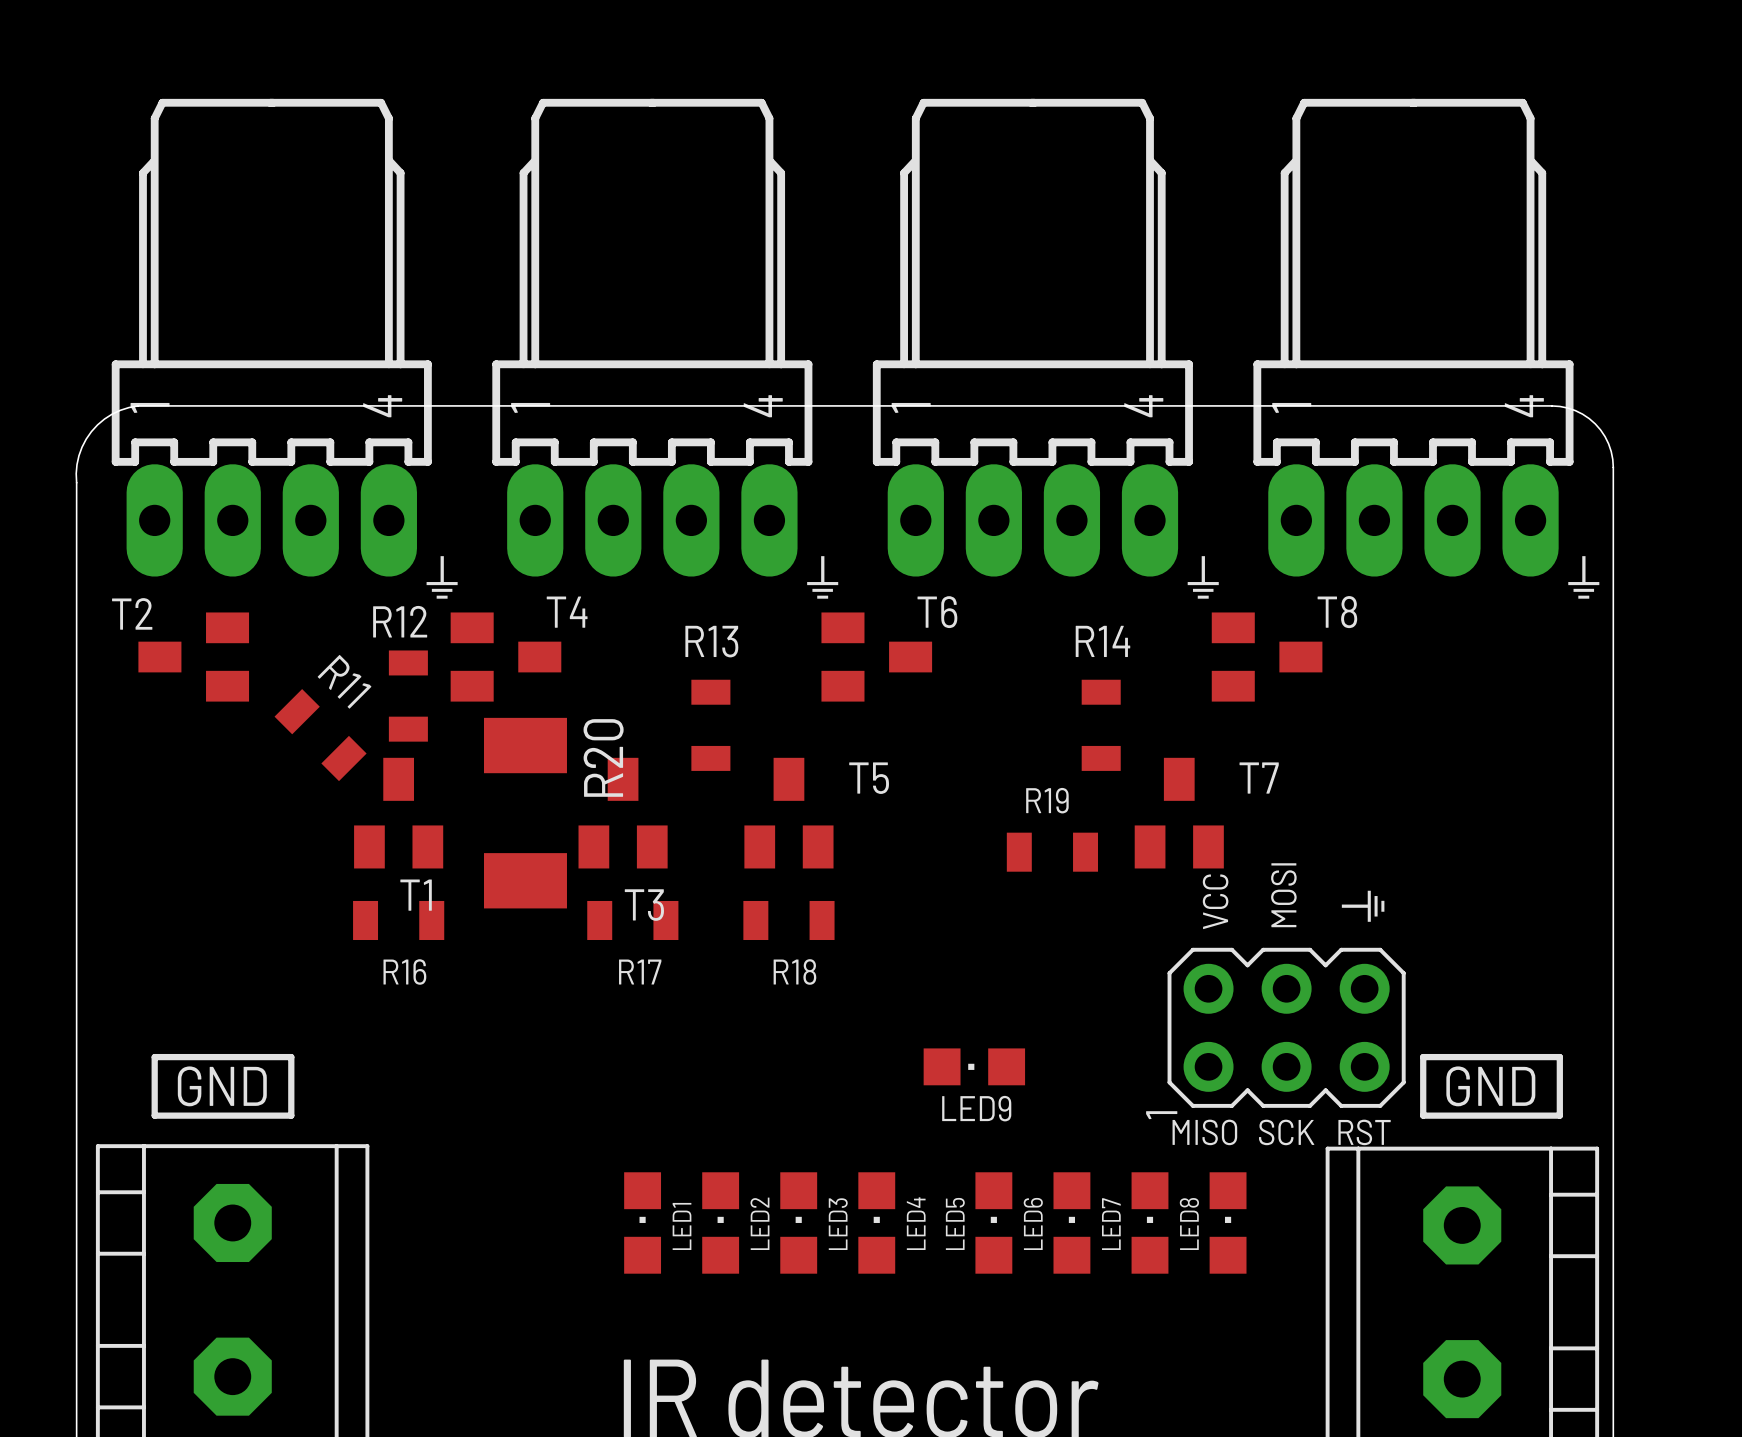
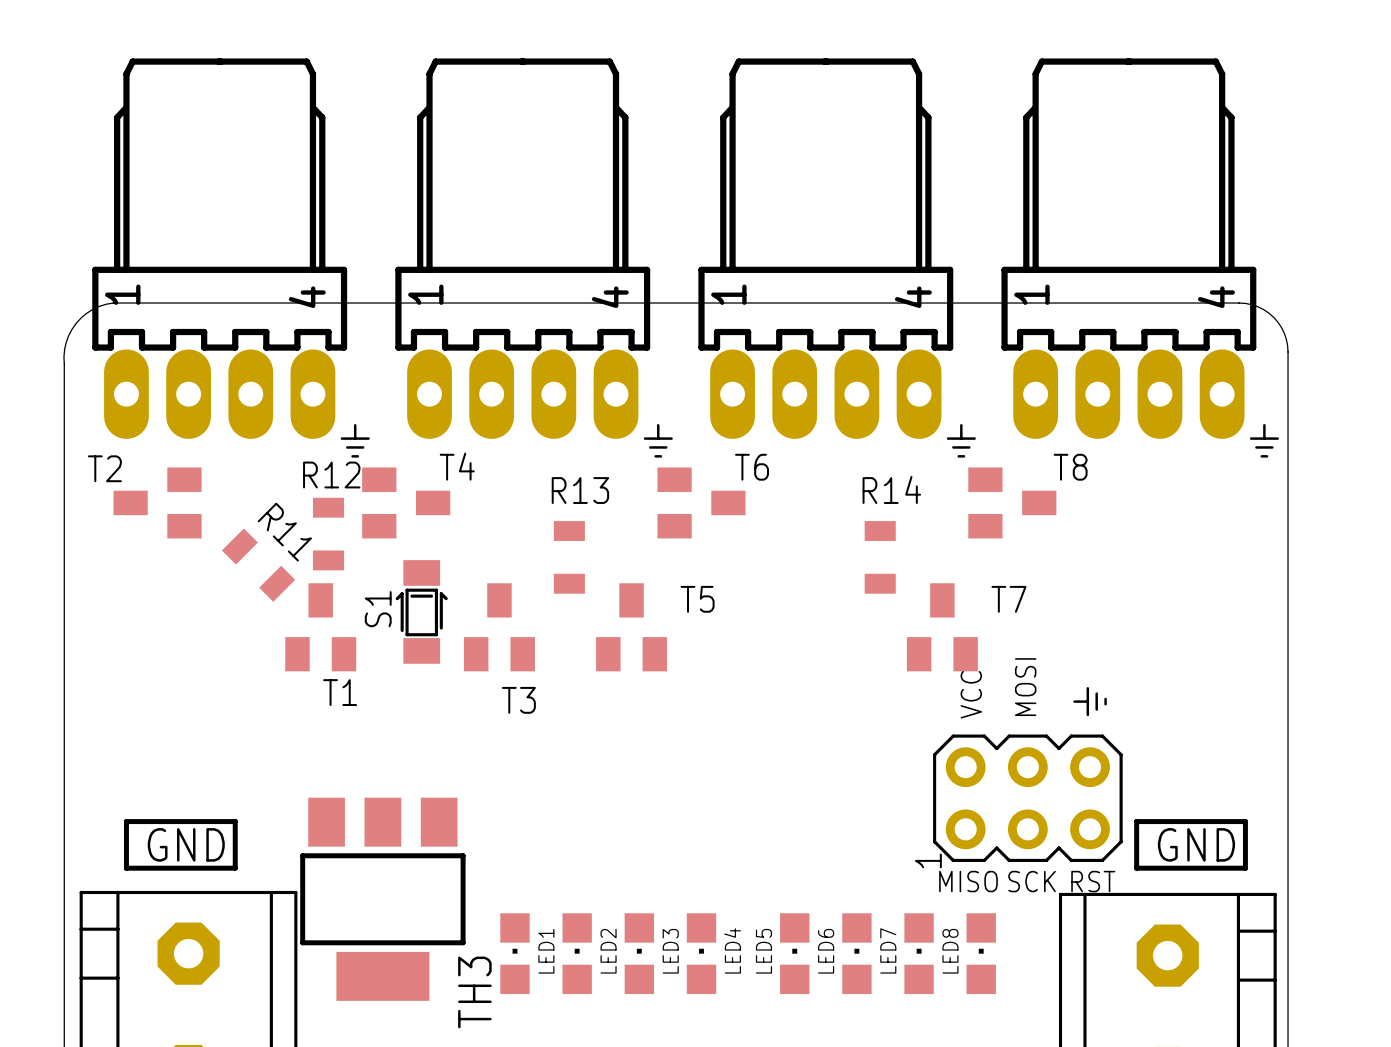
S1: none -> (421, 611)
R20: (525, 813) -> none
R19: (1052, 852) -> none
R16: (398, 920) -> none
R17: (632, 920) -> none
R18: (788, 920) -> none
LED9: (974, 1066) -> none
TH3: none -> (382, 899)

